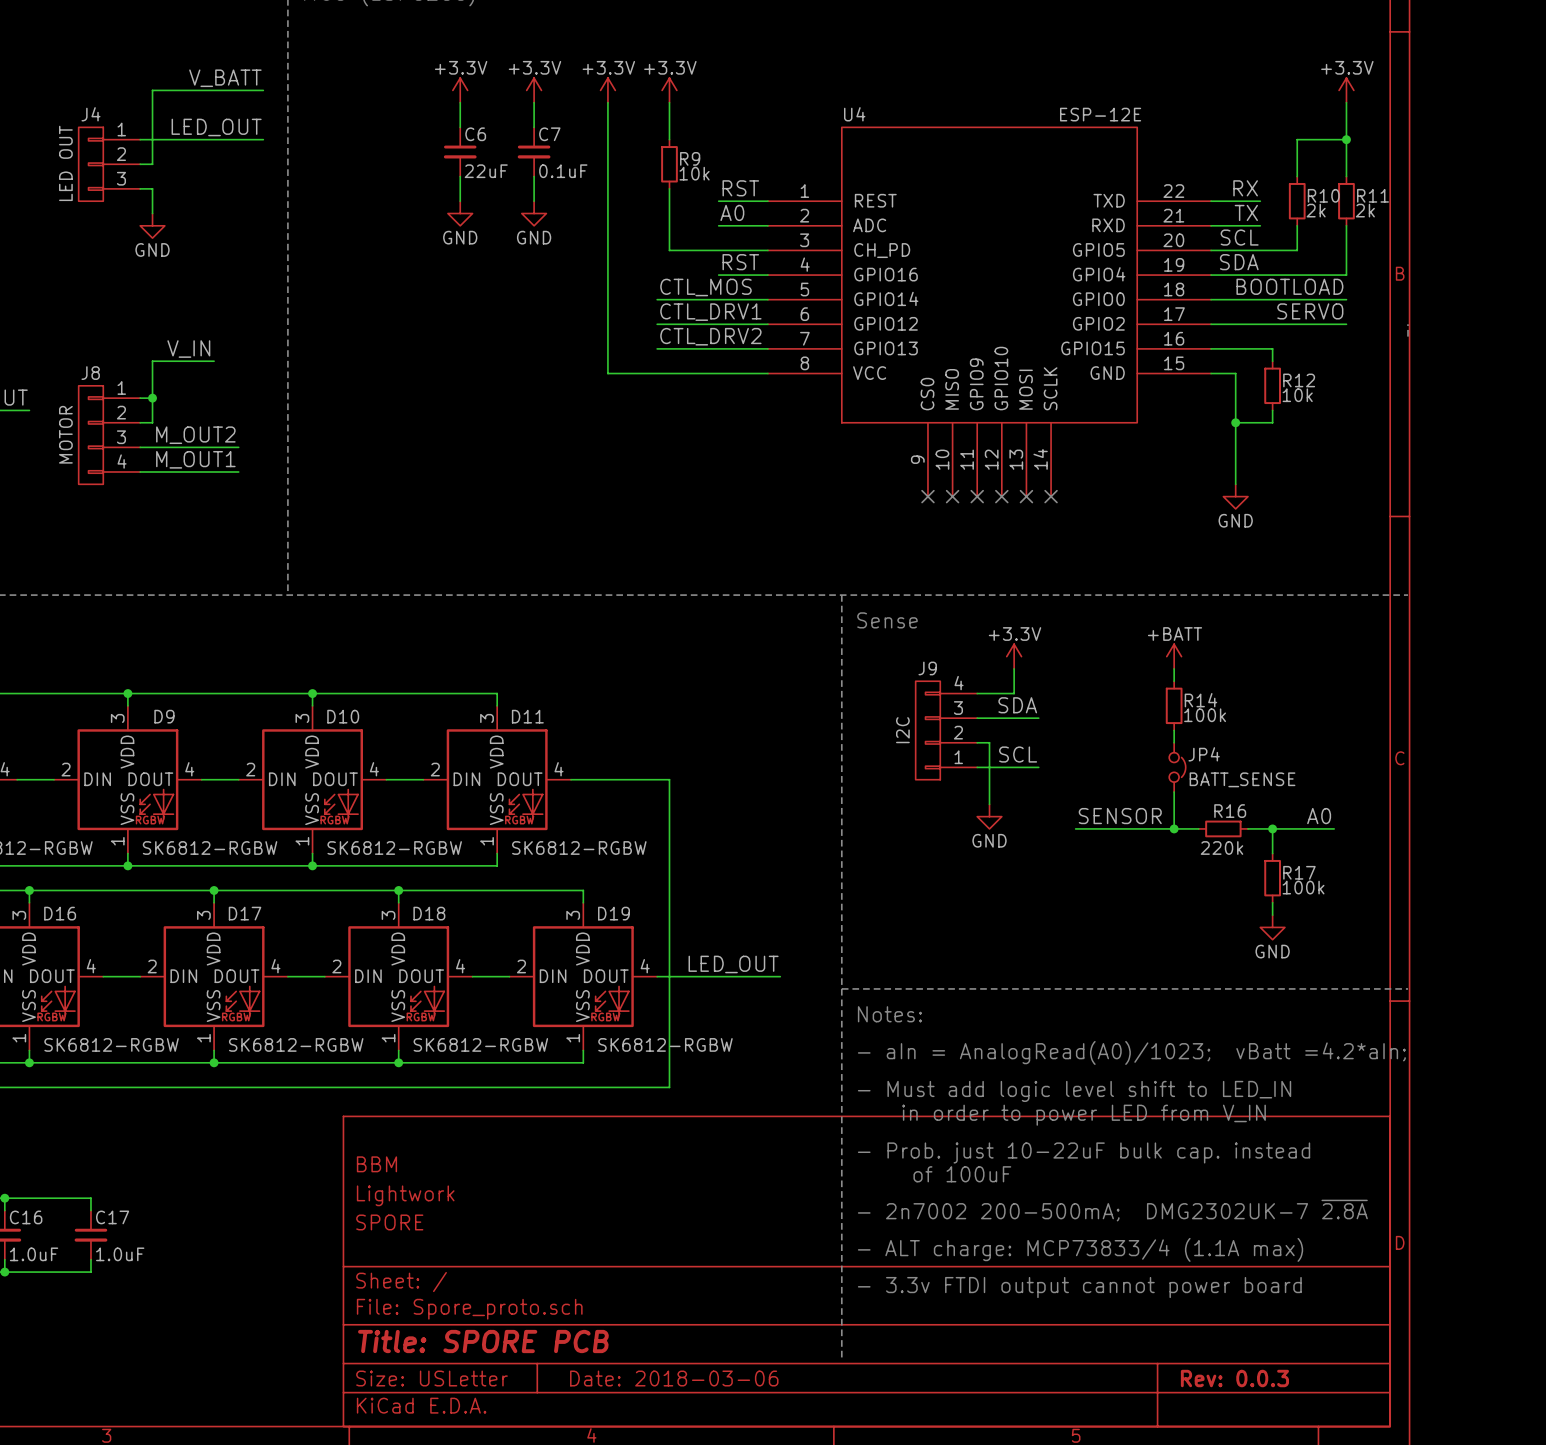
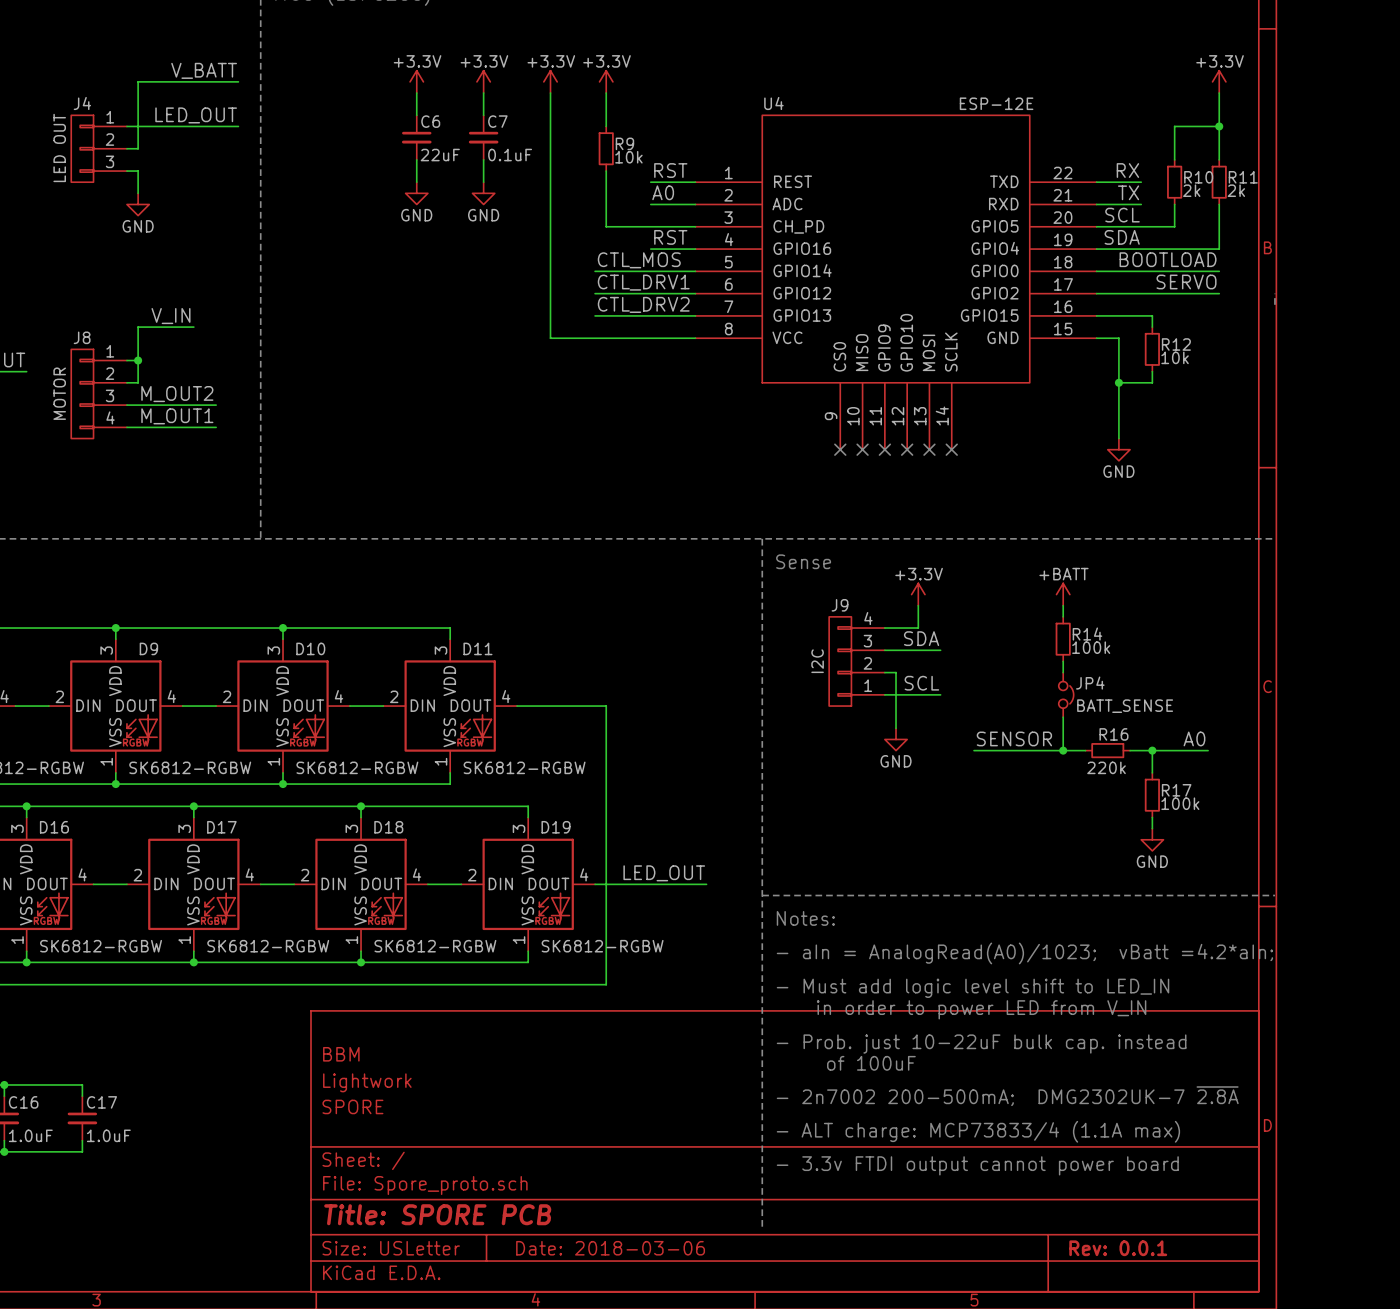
title block: Rev: 0.0.3 (1234, 1378) -> Rev: 0.0.1 (1118, 1248)

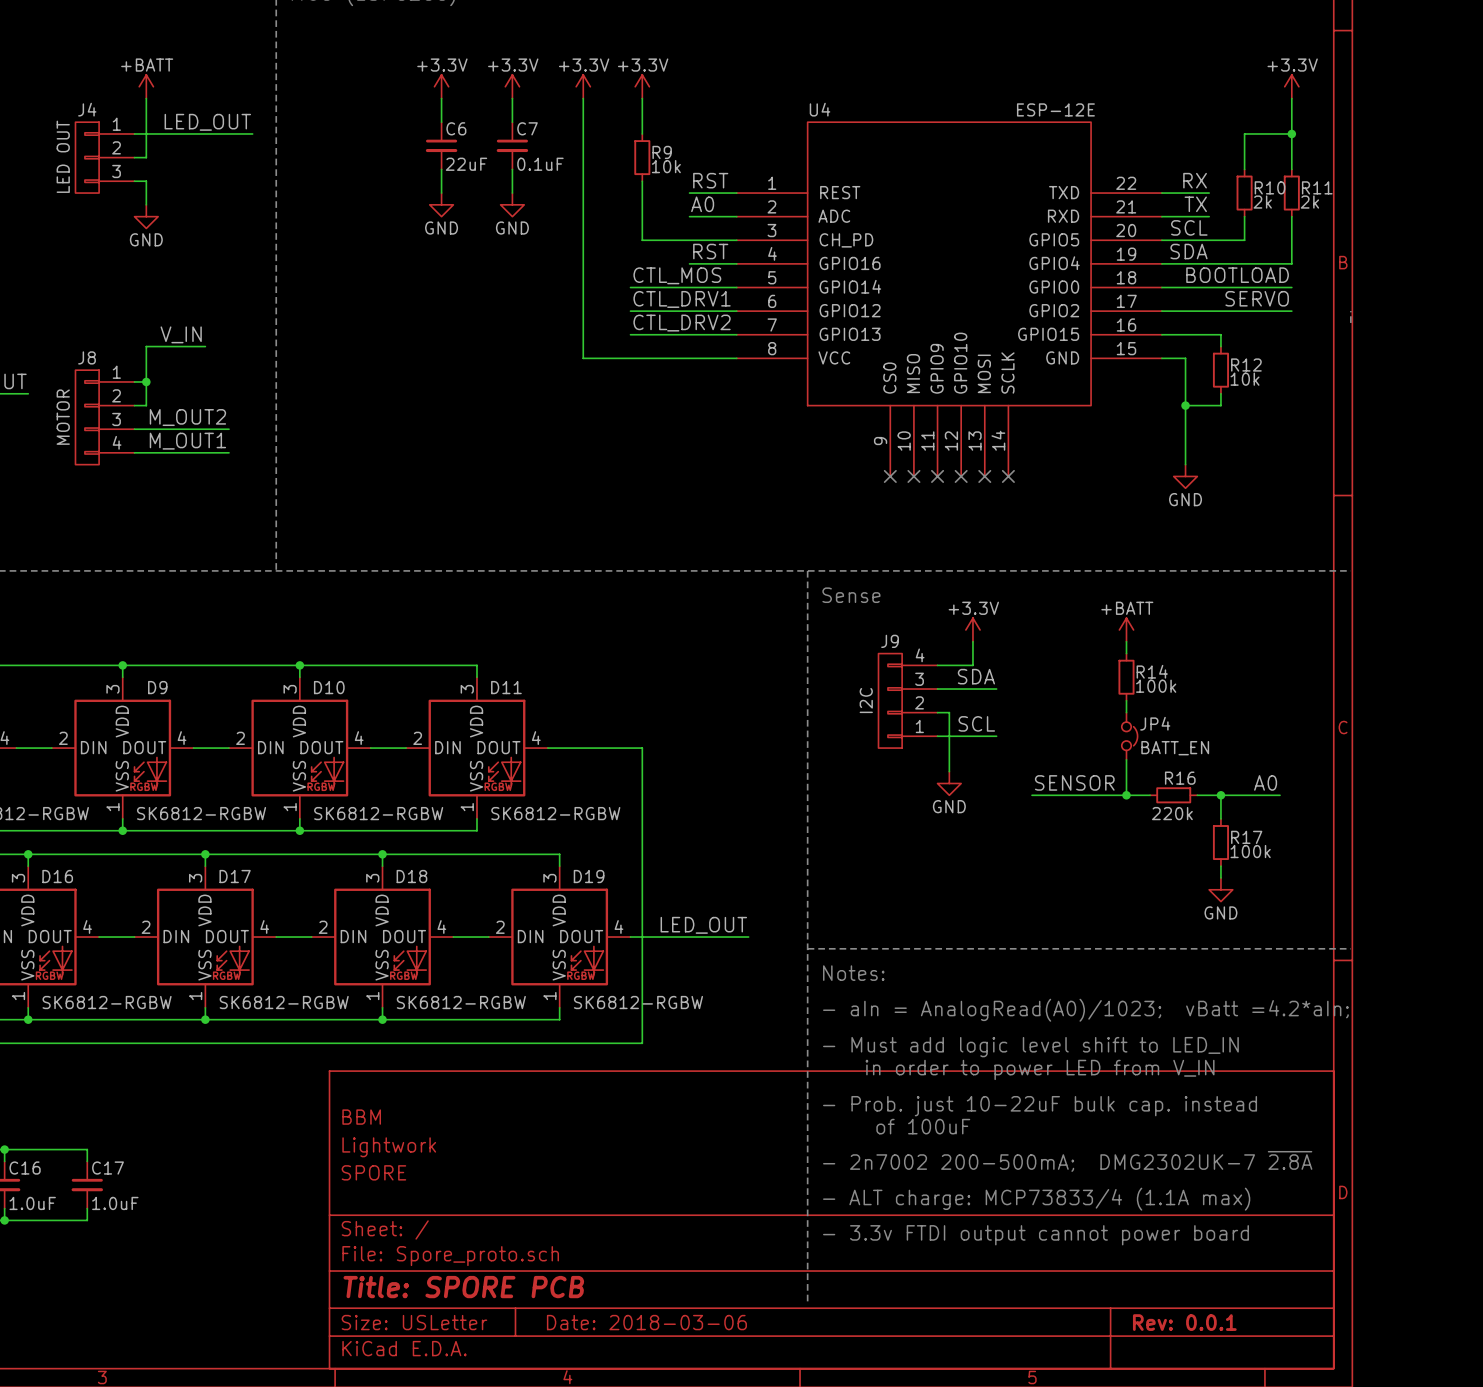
label: V_BATT (204, 70) -> none
power symbol: none -> +BATT (146, 86)
wire: (238, 81) (138, 81) (138, 93) -> none
JP4 value: BATT_SENSE (1125, 706) -> BATT_EN (1175, 748)

